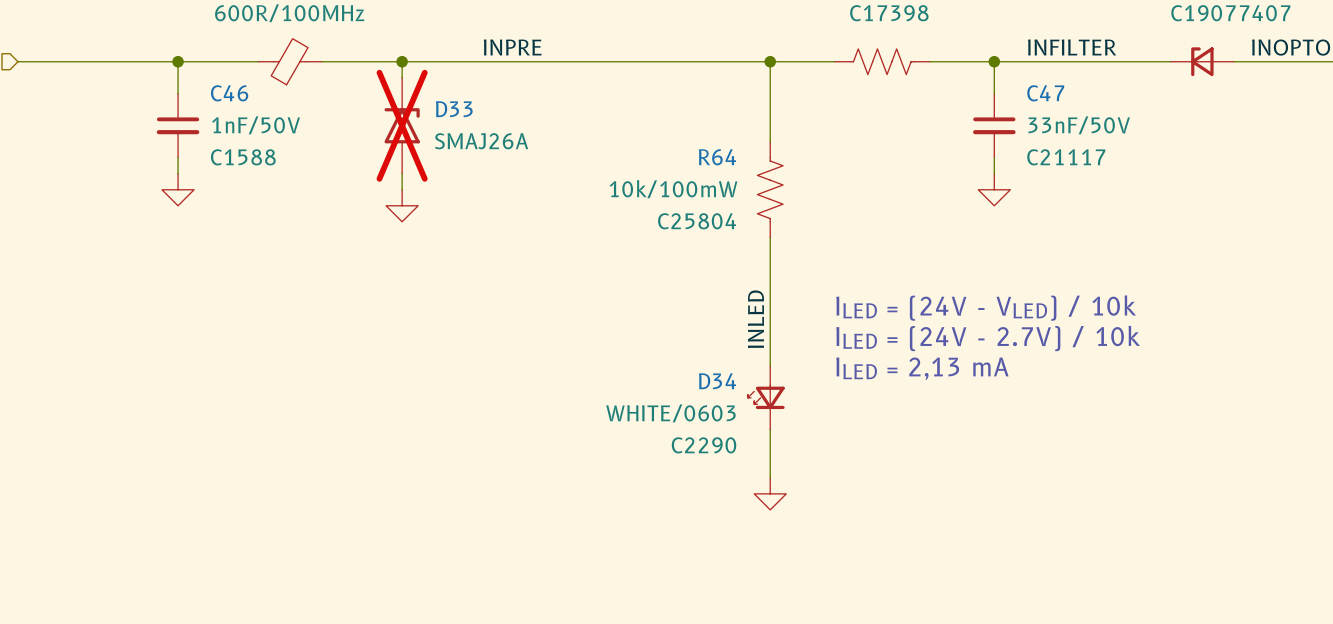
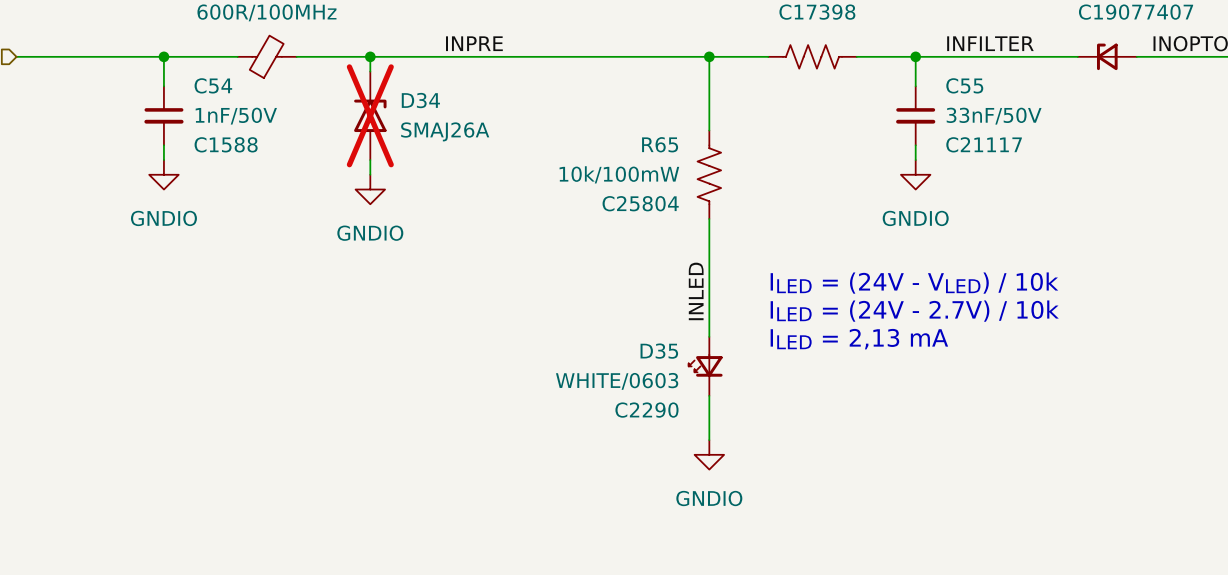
C46 name: C46 (229, 93) -> C54 (213, 85)
C47 name: C47 (1045, 93) -> C55 (964, 85)
D33 name: D33 (454, 109) -> D34 (420, 100)
R64 name: R64 (717, 157) -> R65 (660, 144)
power symbol text: none -> GNDIO (163, 218)
power symbol text: none -> GNDIO (915, 218)
power symbol text: none -> GNDIO (370, 233)
D34 name: D34 (717, 381) -> D35 (659, 351)
power symbol text: none -> GNDIO (709, 498)

